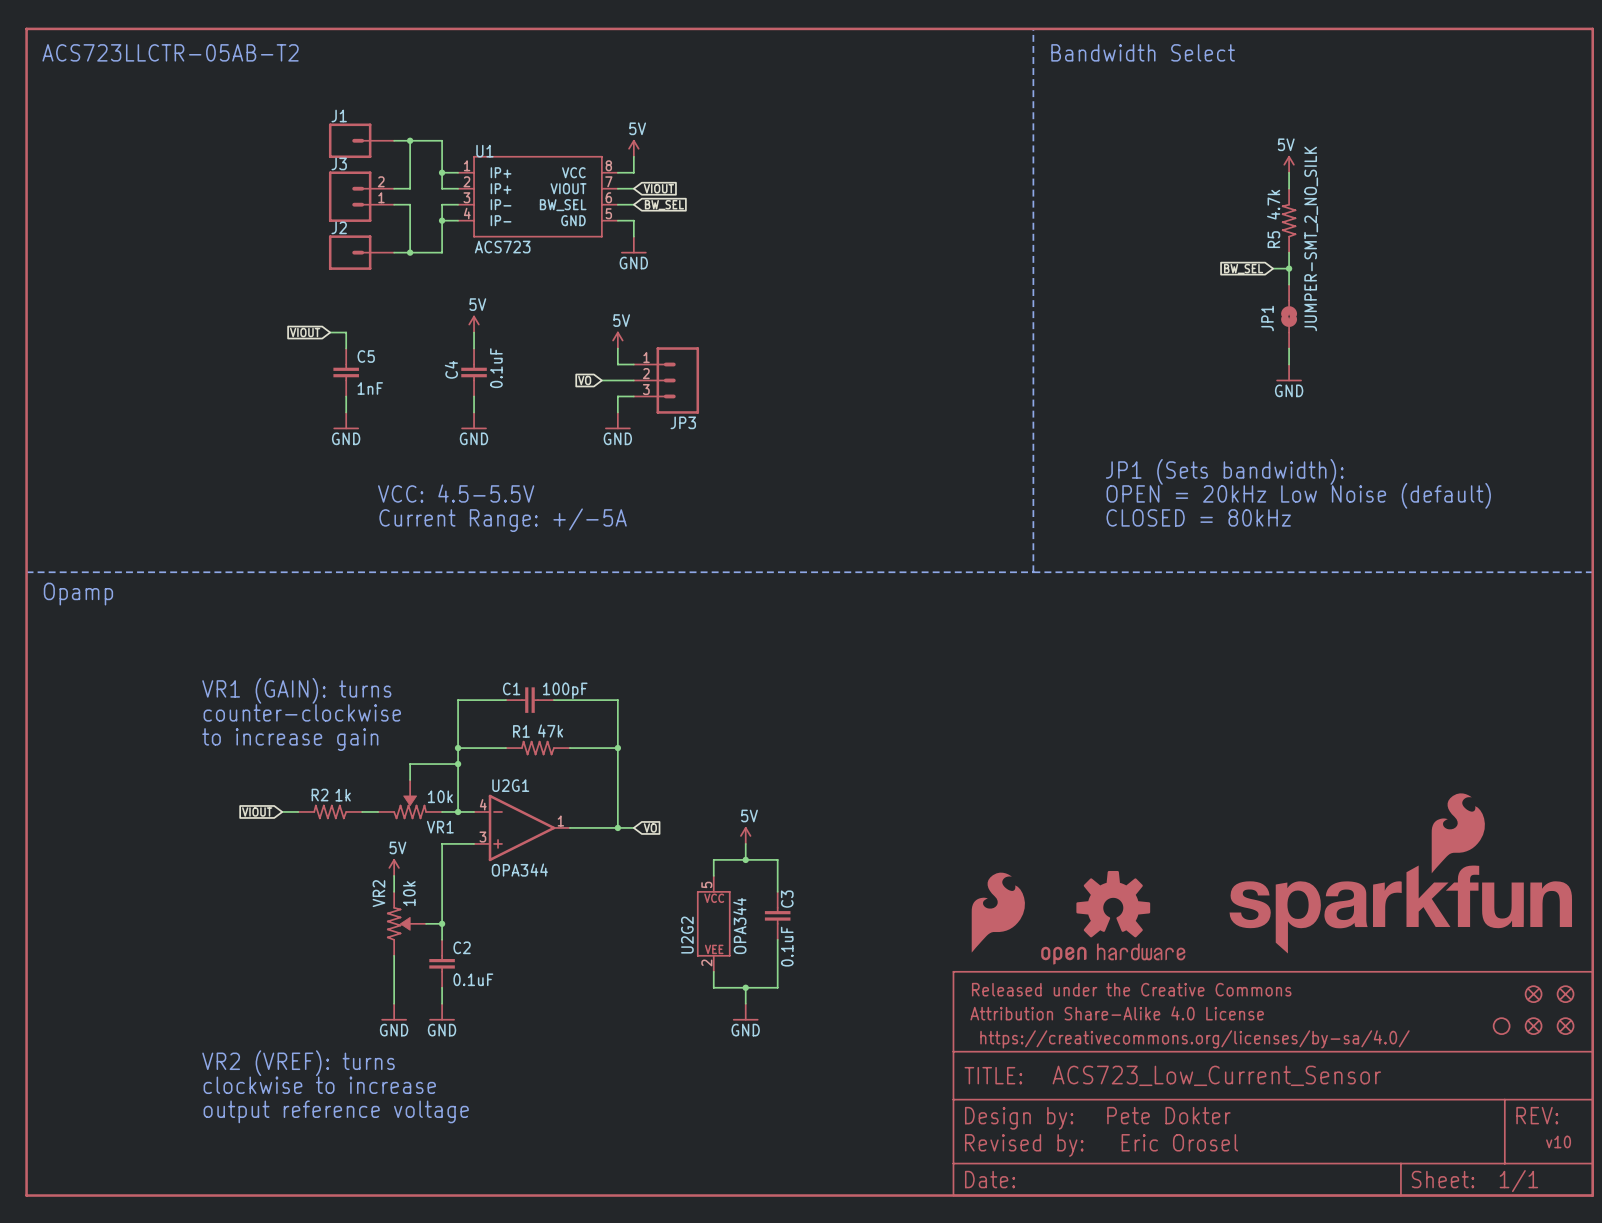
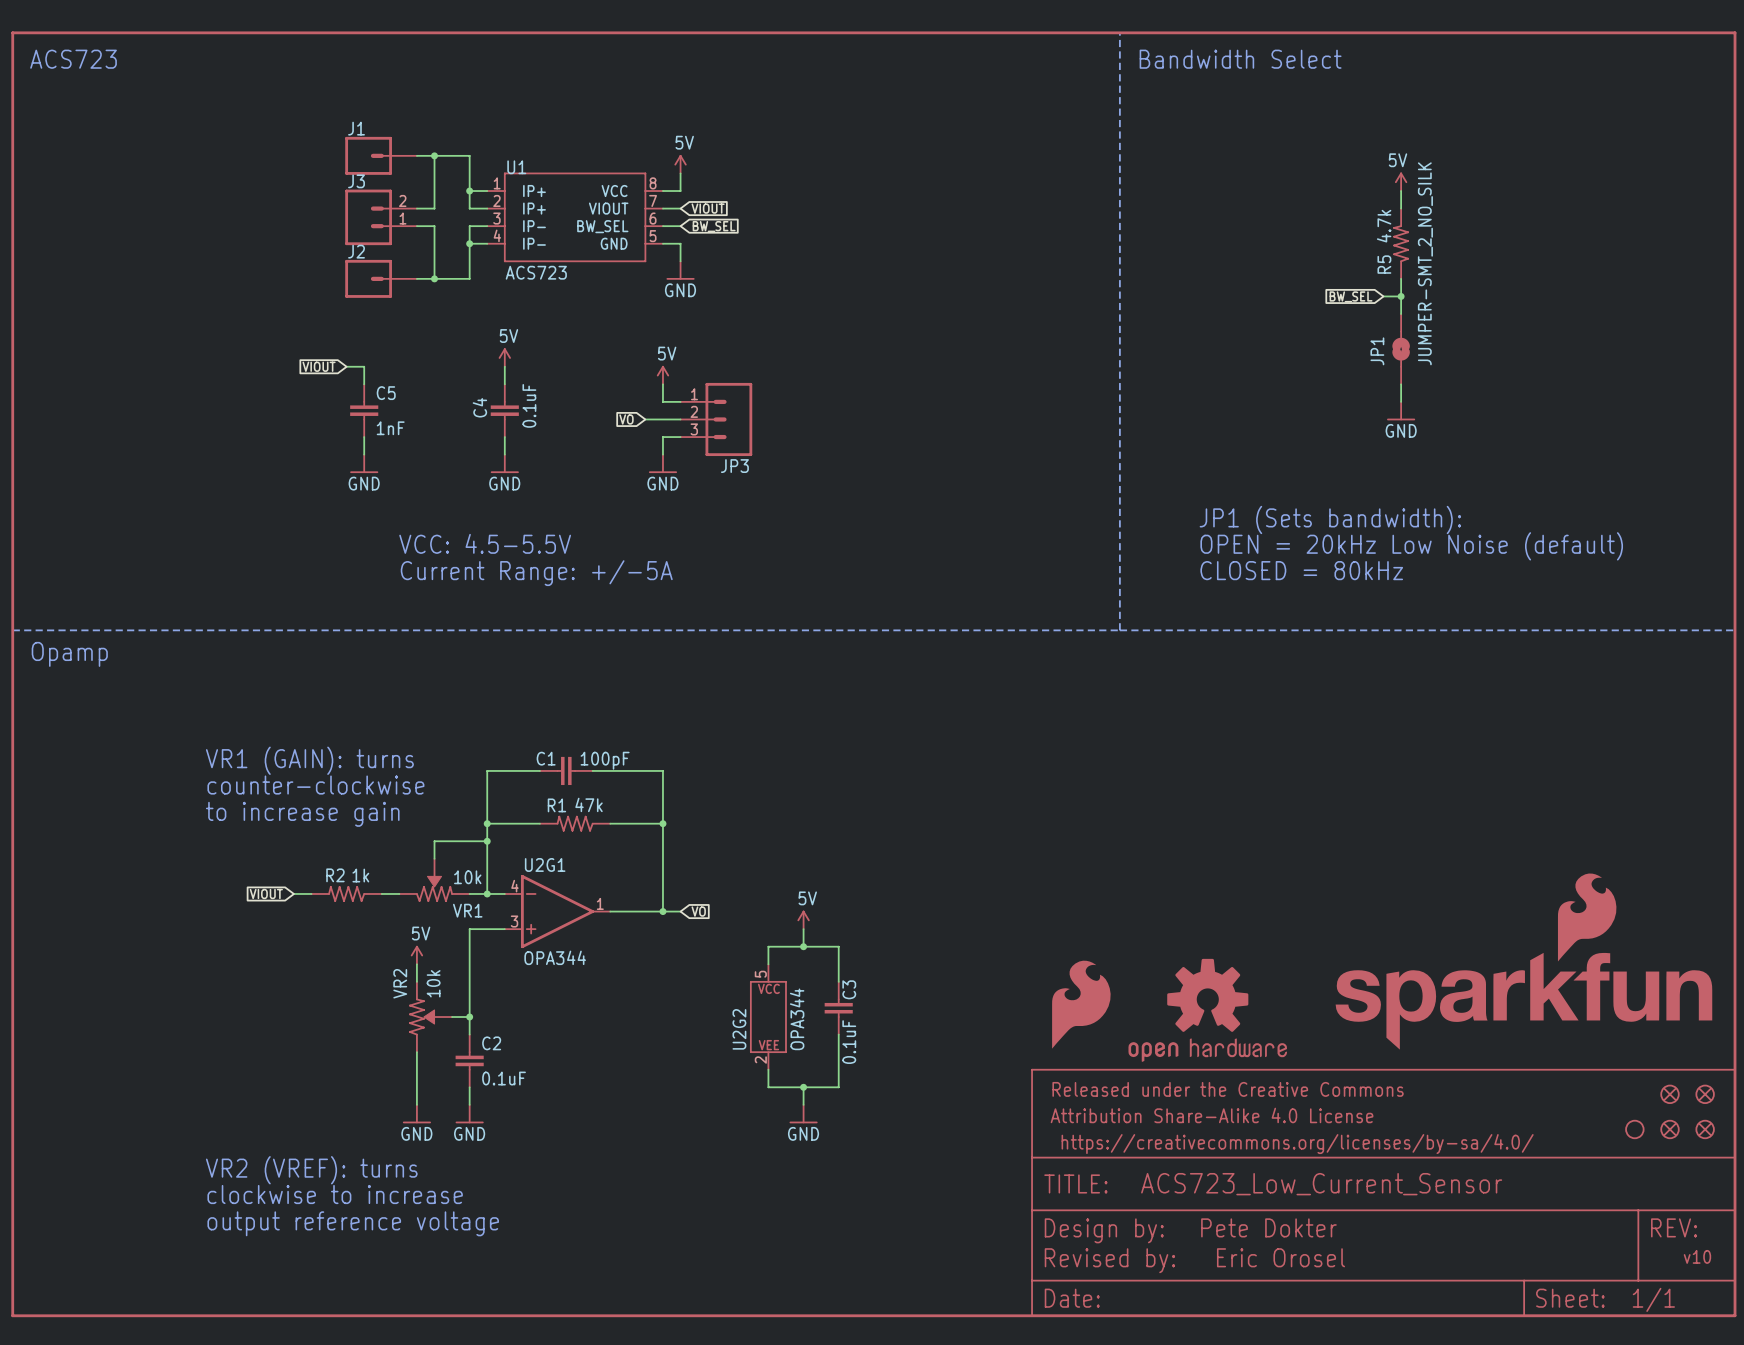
text: ACS723LLCTR-05AB-T2 (170, 52) -> ACS723 (73, 59)

